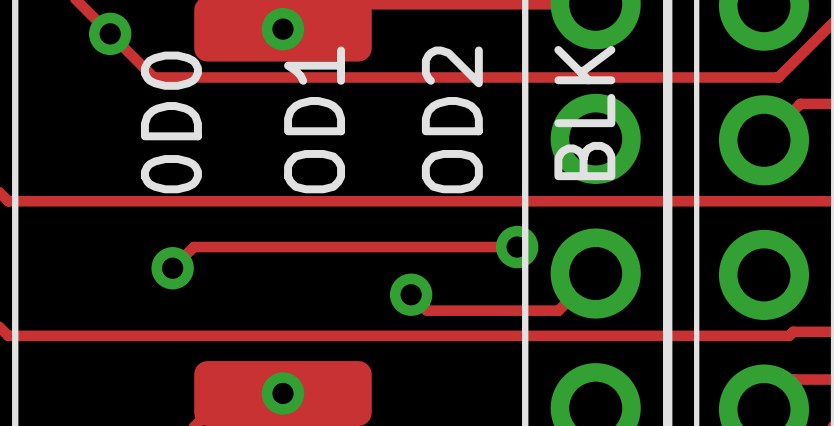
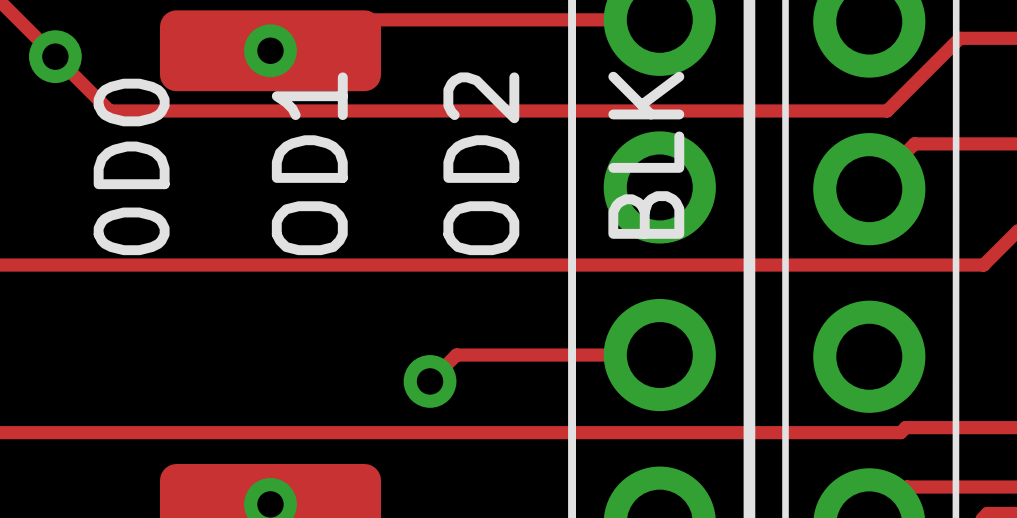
track: (517, 247) (193, 247) (172, 268) -> none
via: (517, 247) -> none
via: (172, 268) -> none
track: (595, 273) (558, 310) (427, 310) (411, 294) -> (659, 355) (456, 355) (430, 381)

